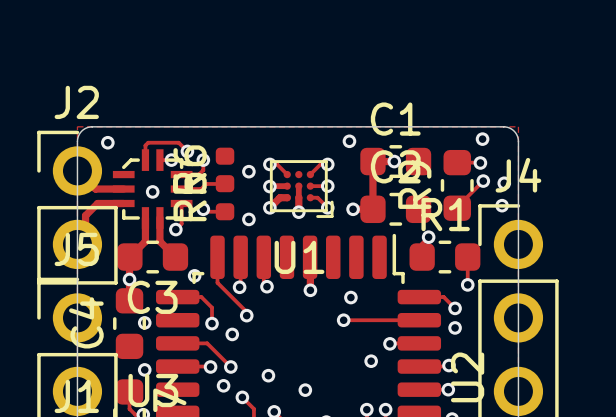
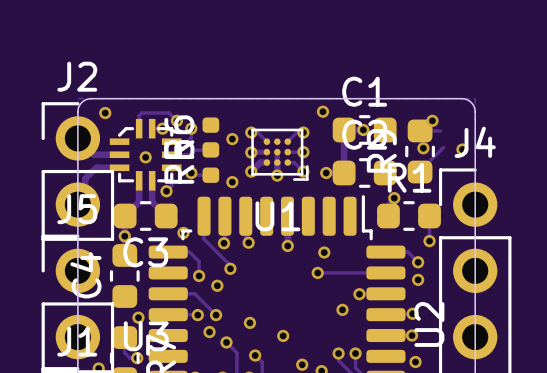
via: (482, 139) -> none
via: none -> (432, 120)
via: (480, 162) -> none
via: none -> (423, 148)
via: (483, 181) -> none
via: (502, 205) -> none
via: (144, 322) -> none

